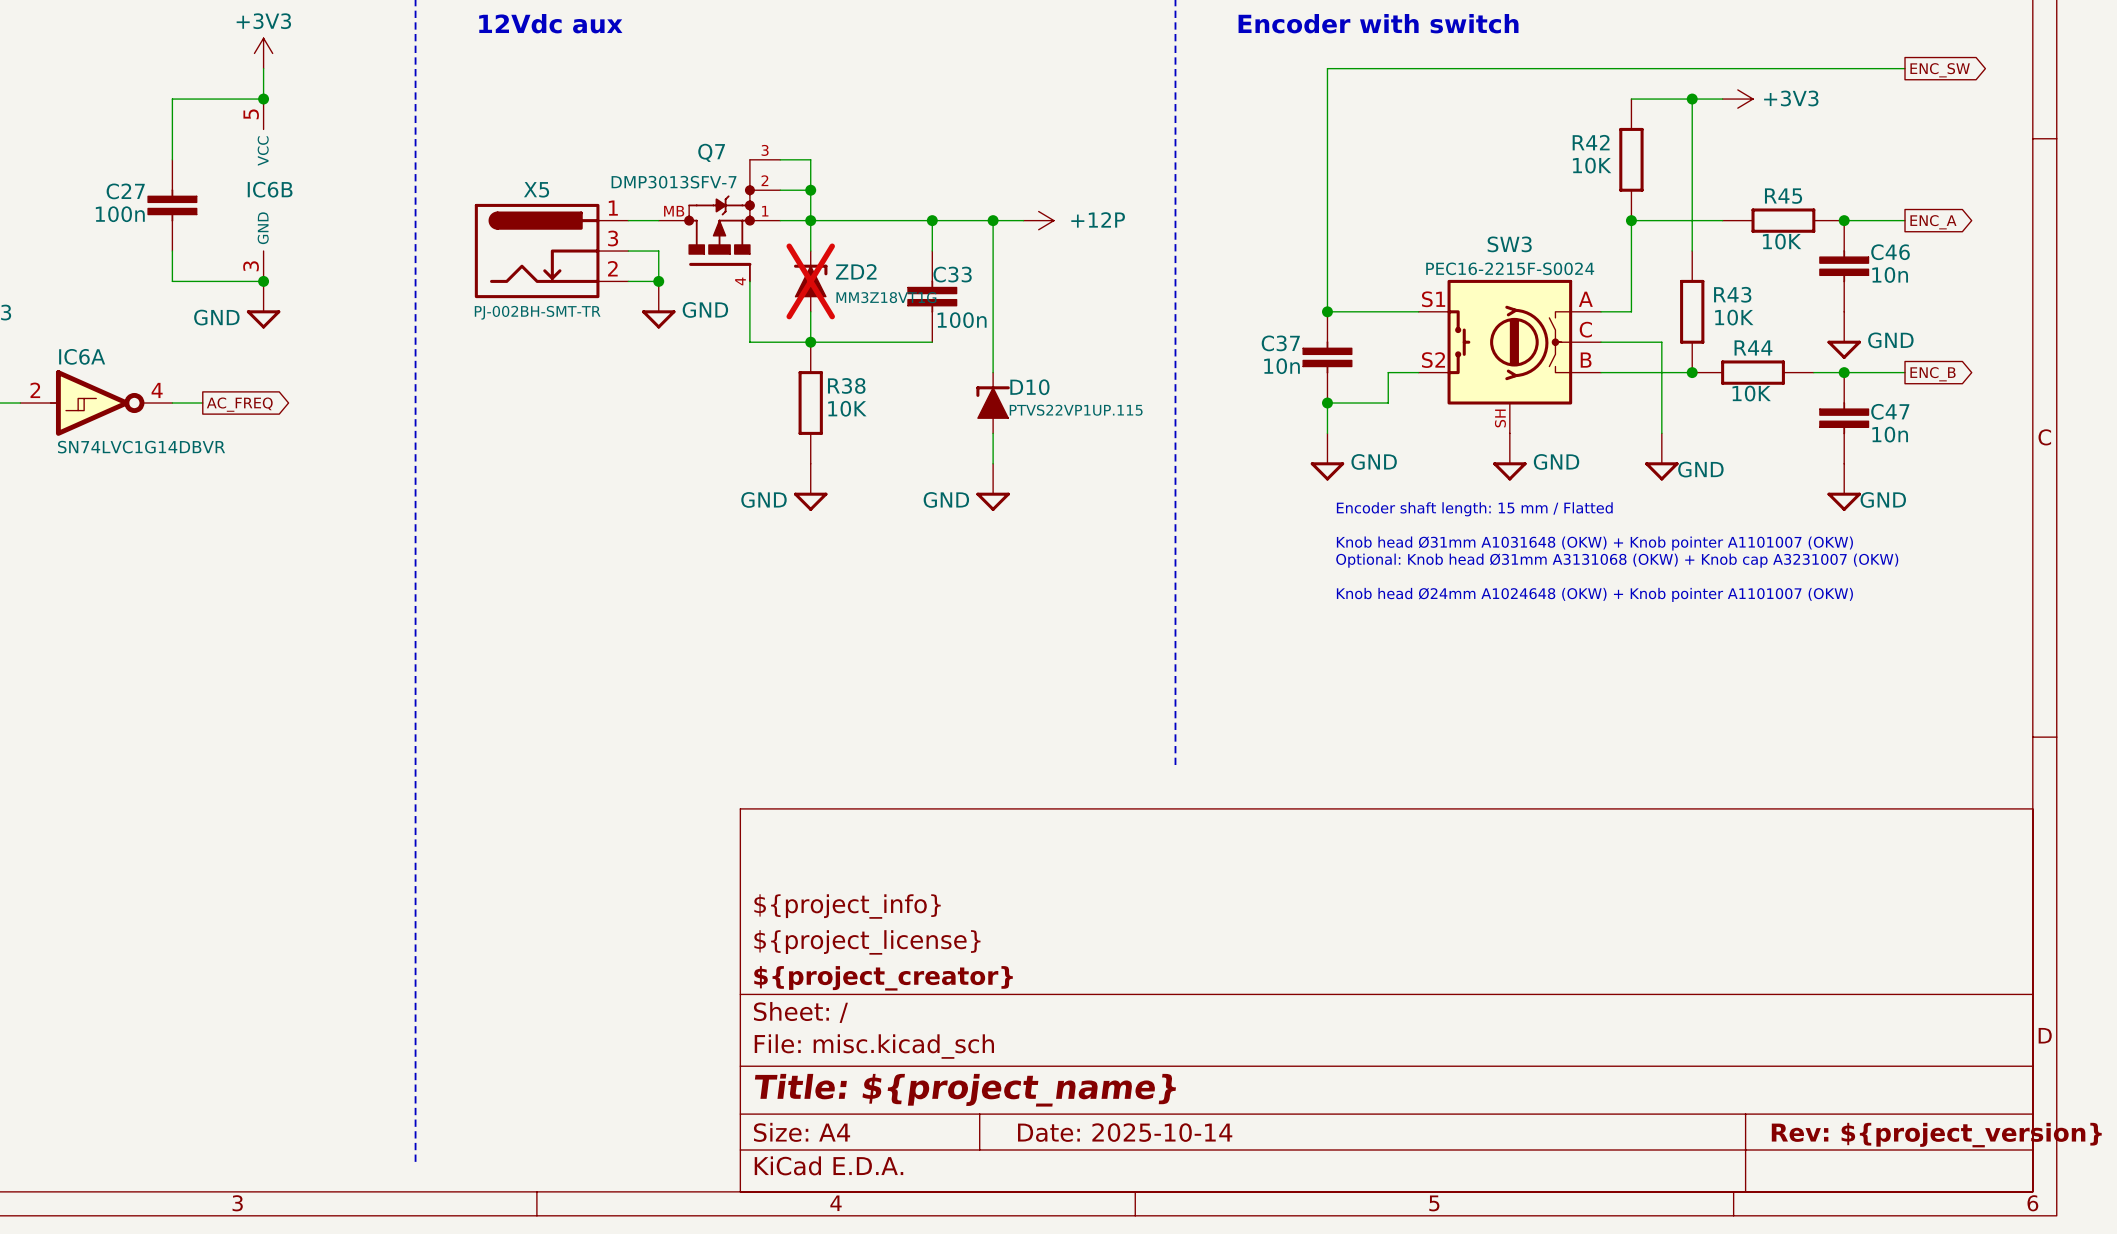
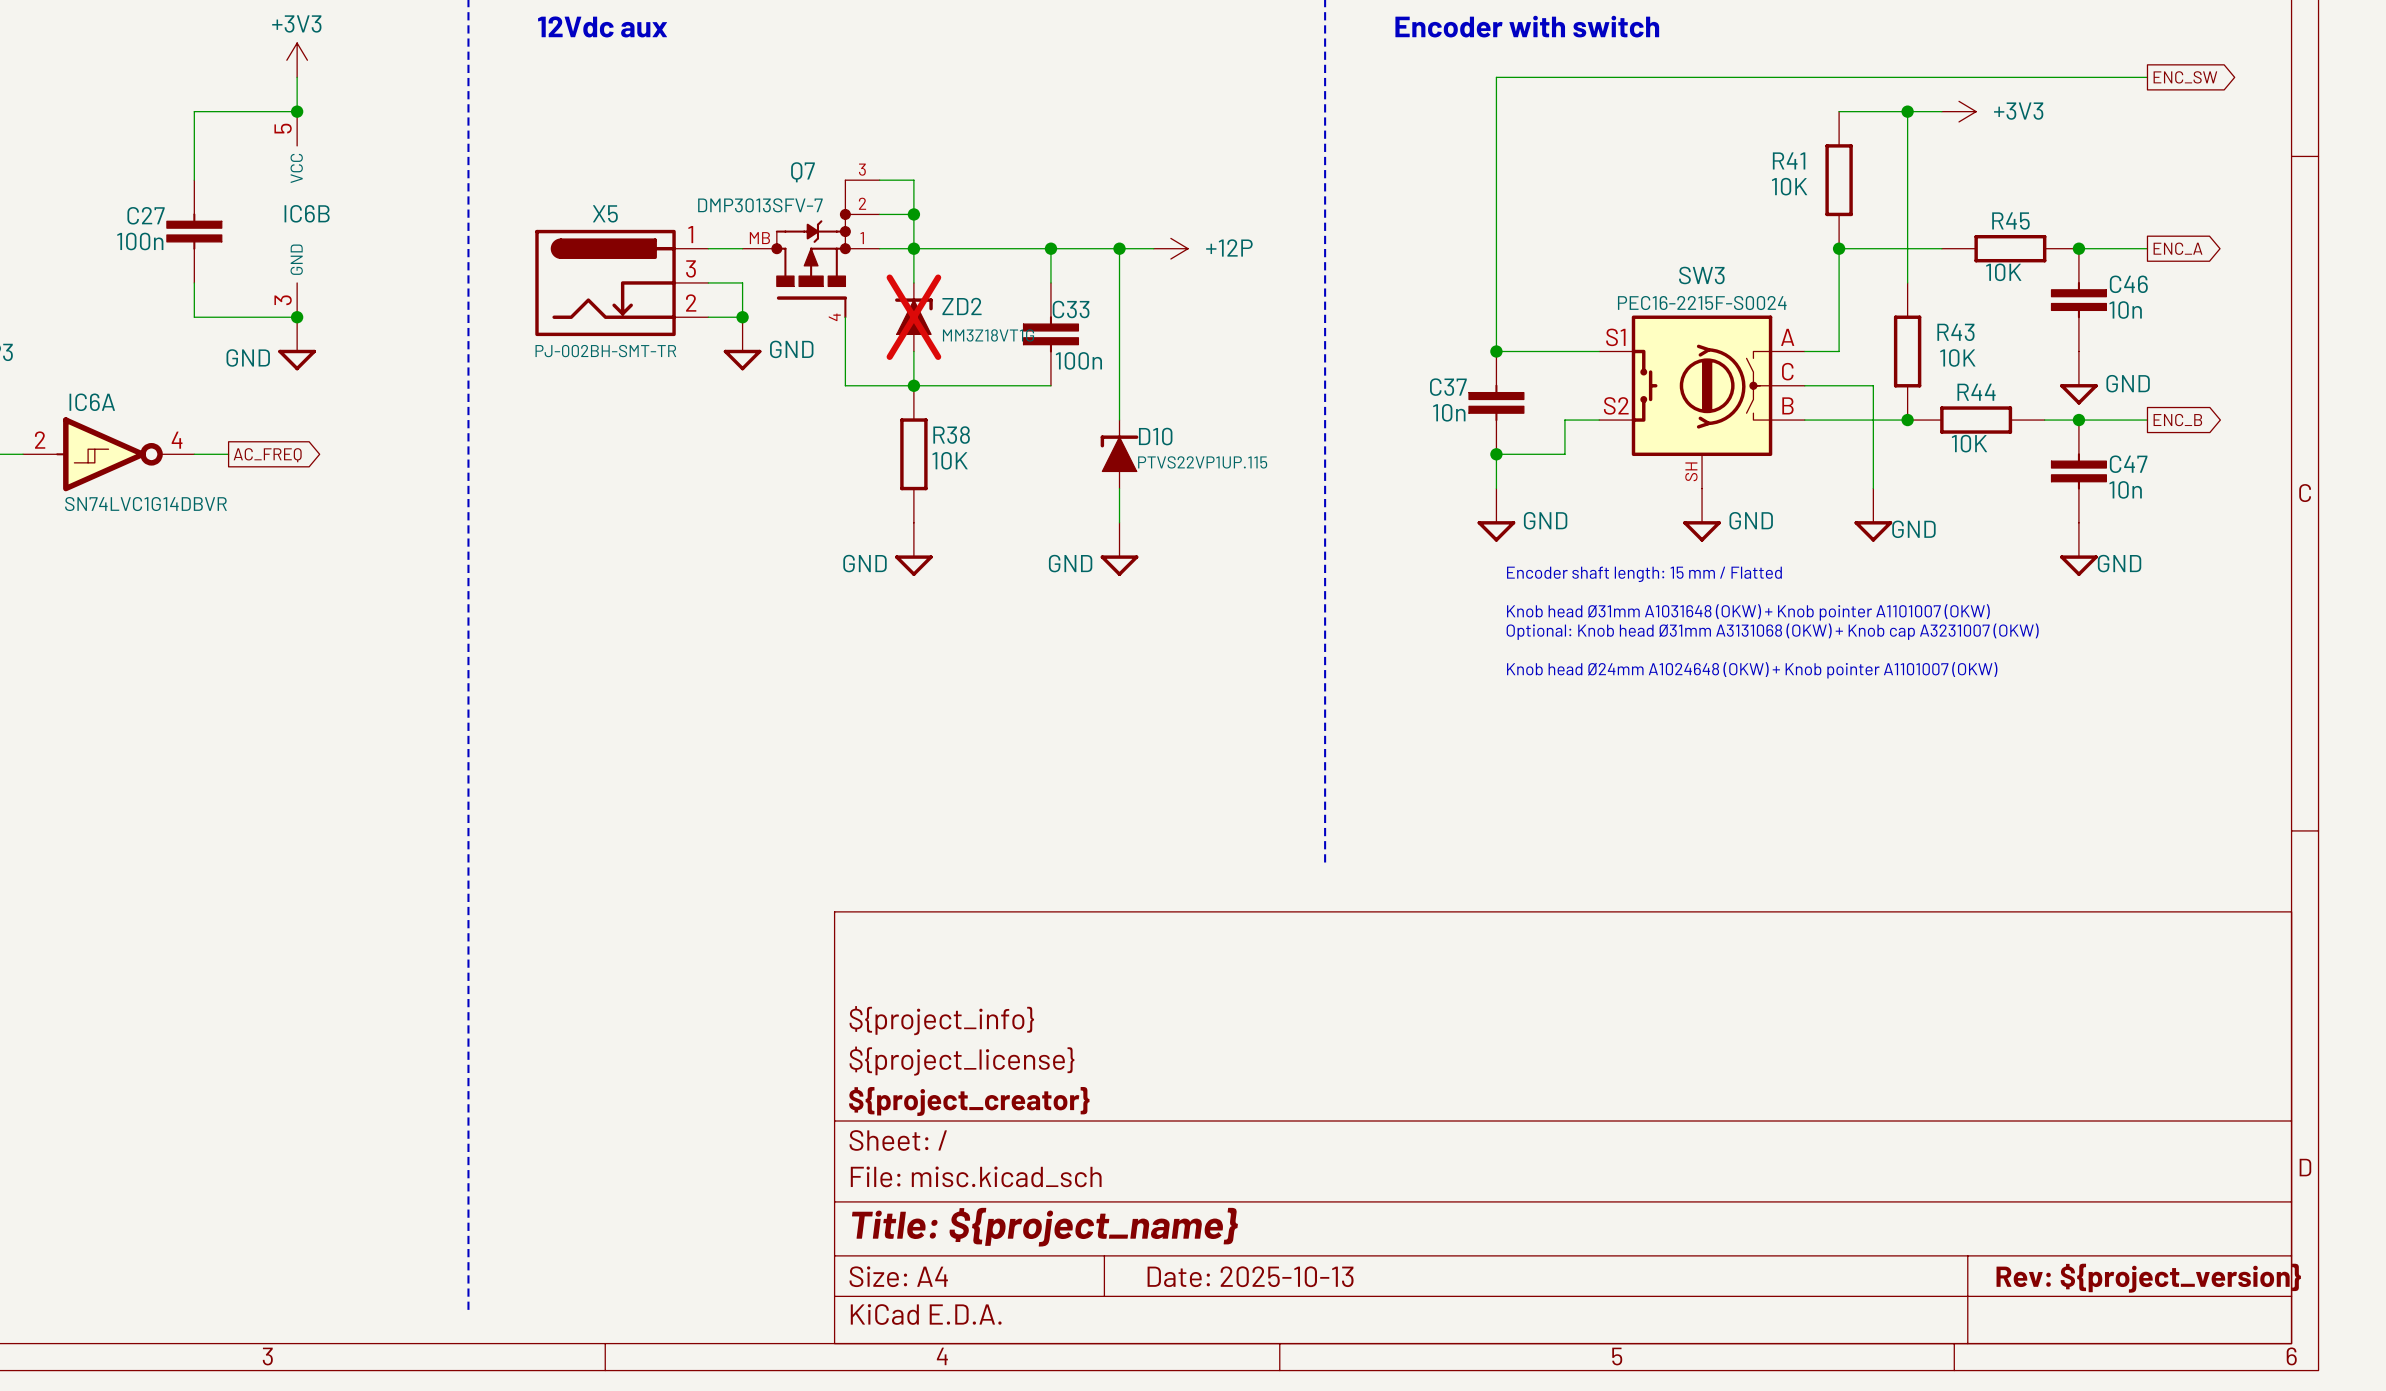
R42 name: R42 (1591, 142) -> R41 (1789, 160)
title block: Date: 2025-10-14 (1125, 1132) -> Date: 2025-10-13 (1250, 1276)

